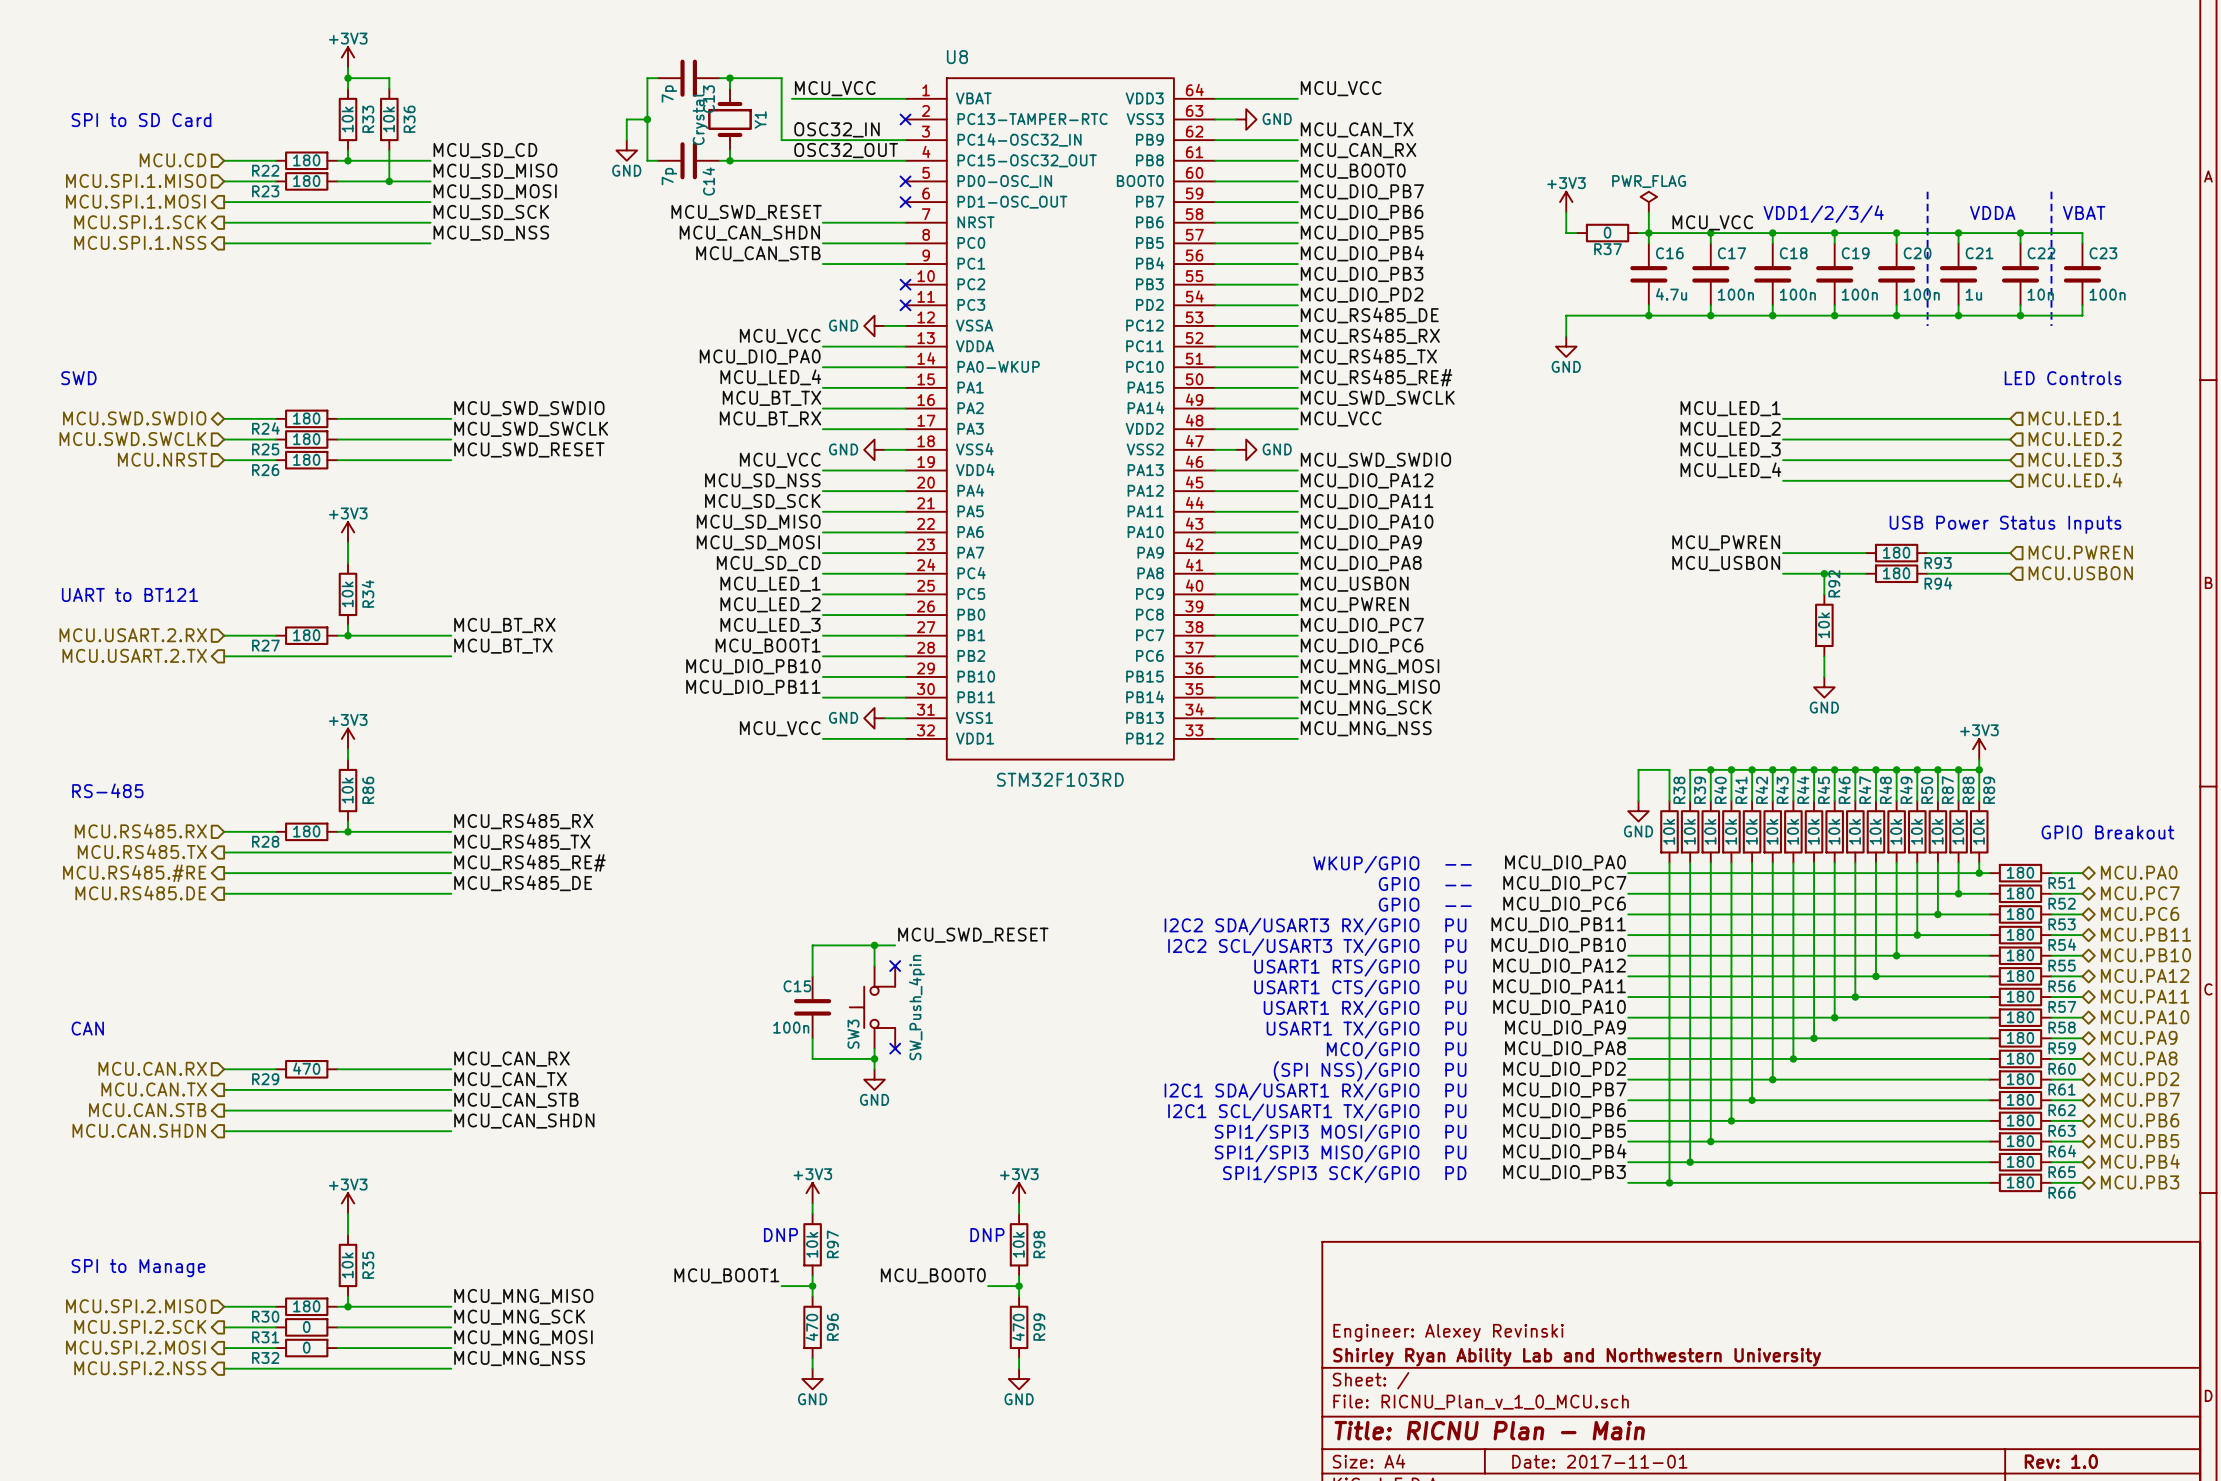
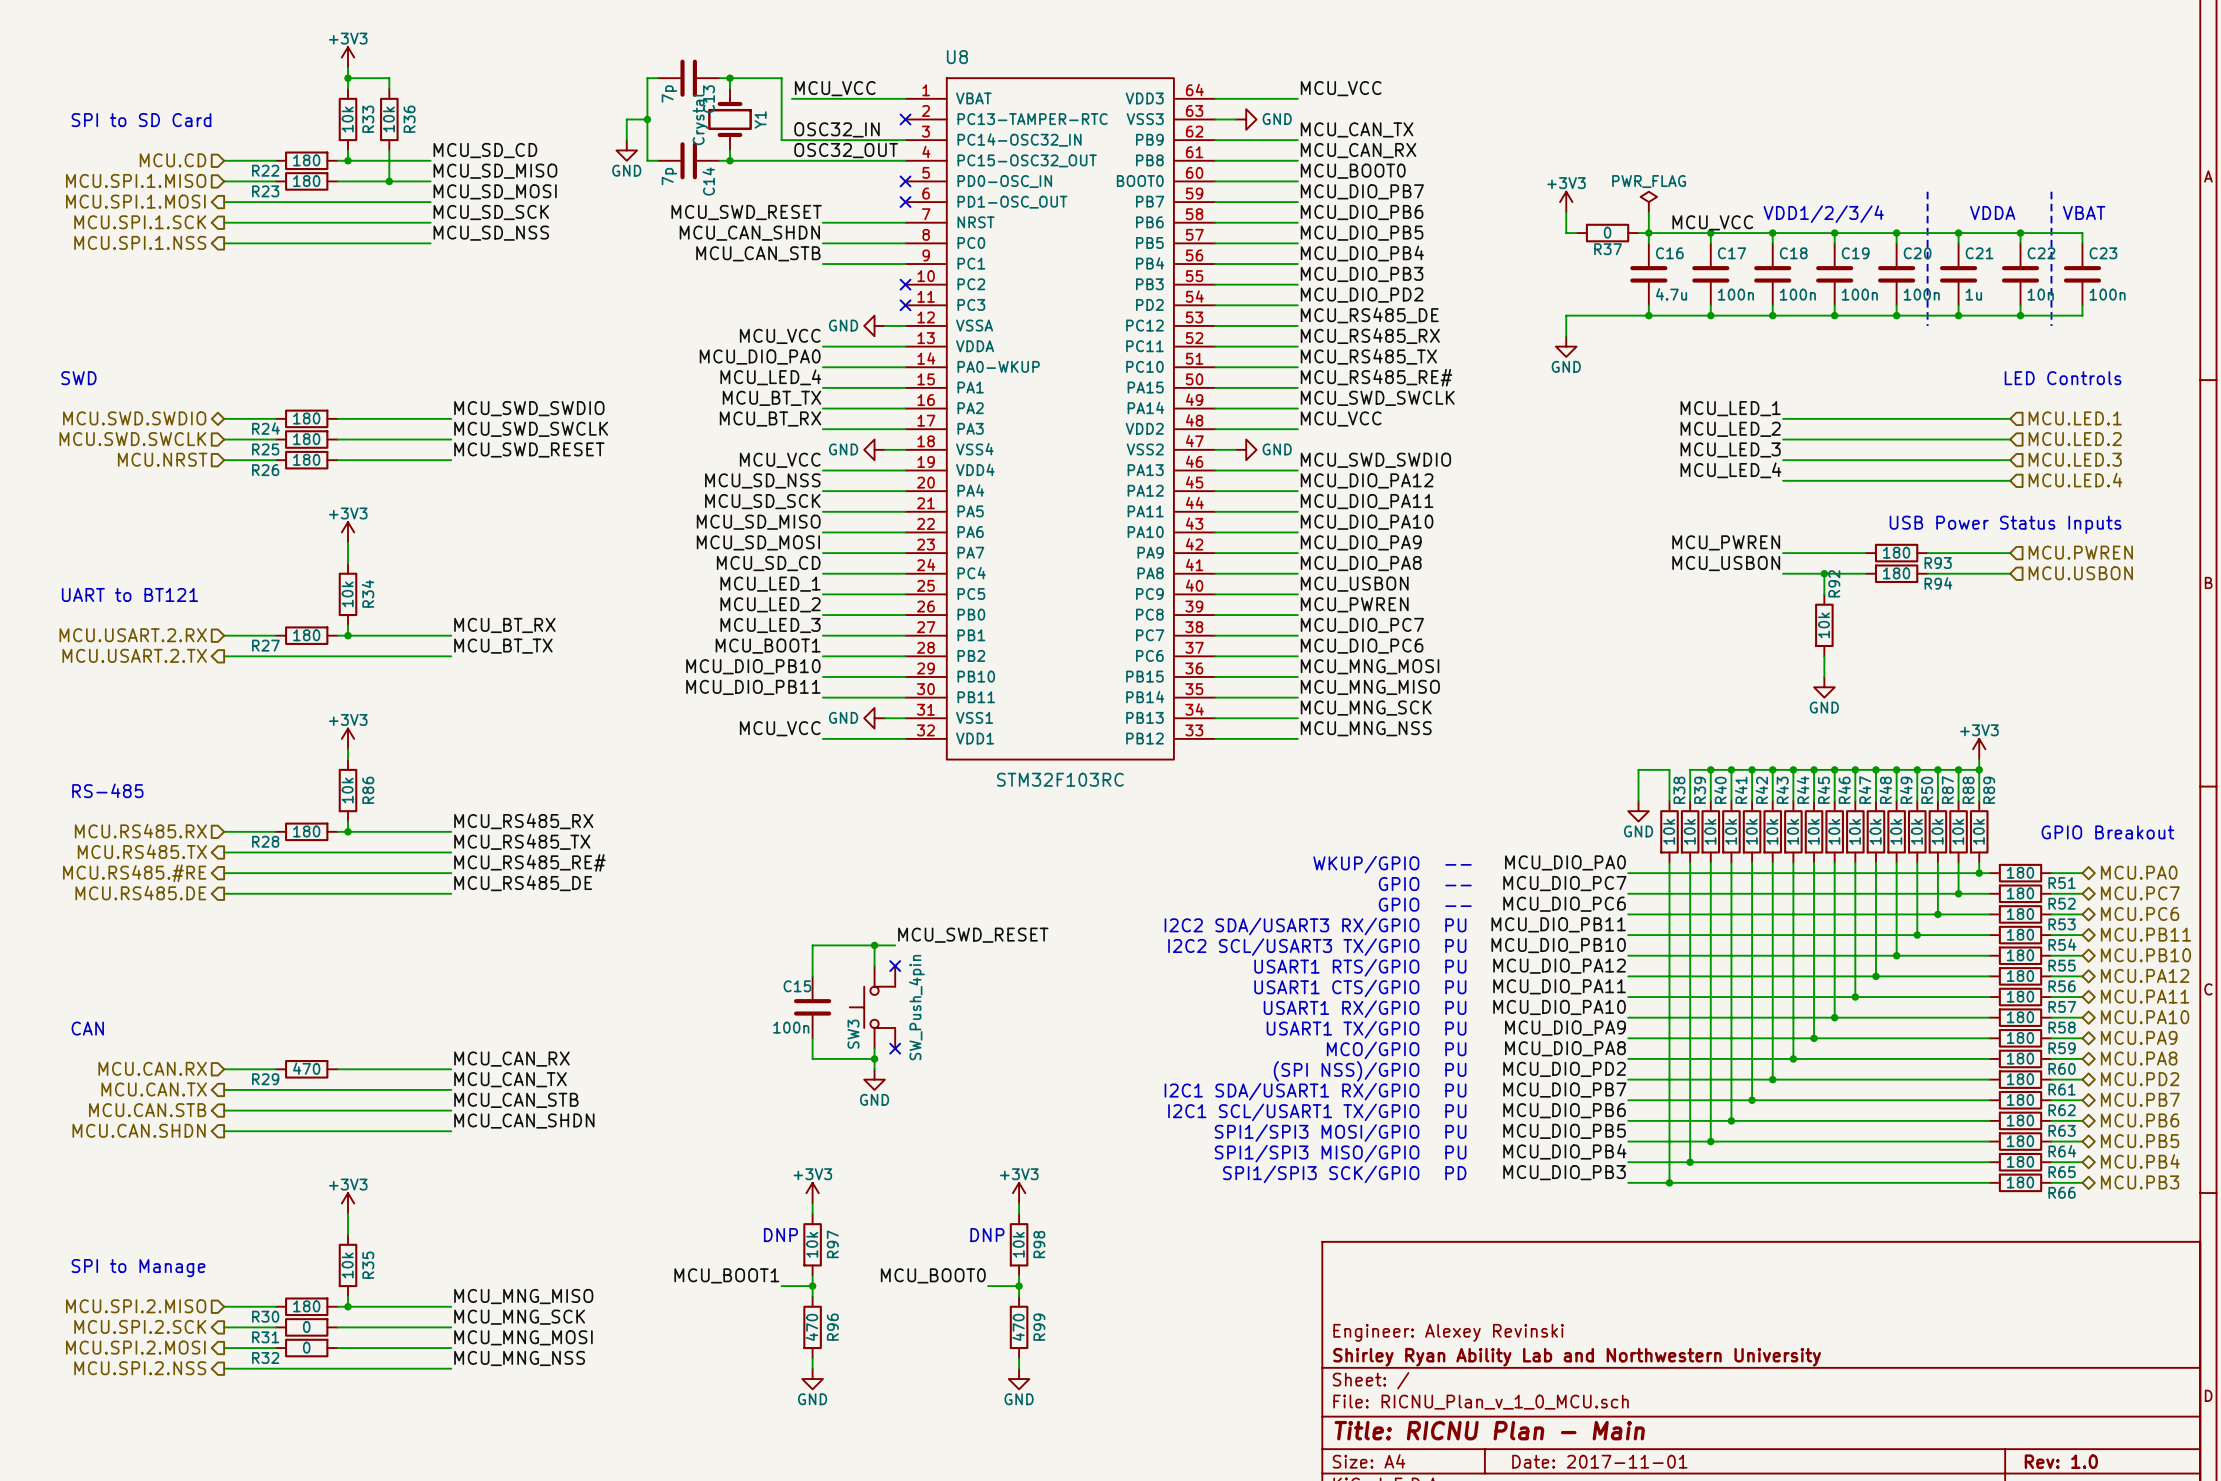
U8 value: STM32F103RD (1060, 779) -> STM32F103RC (1060, 779)

